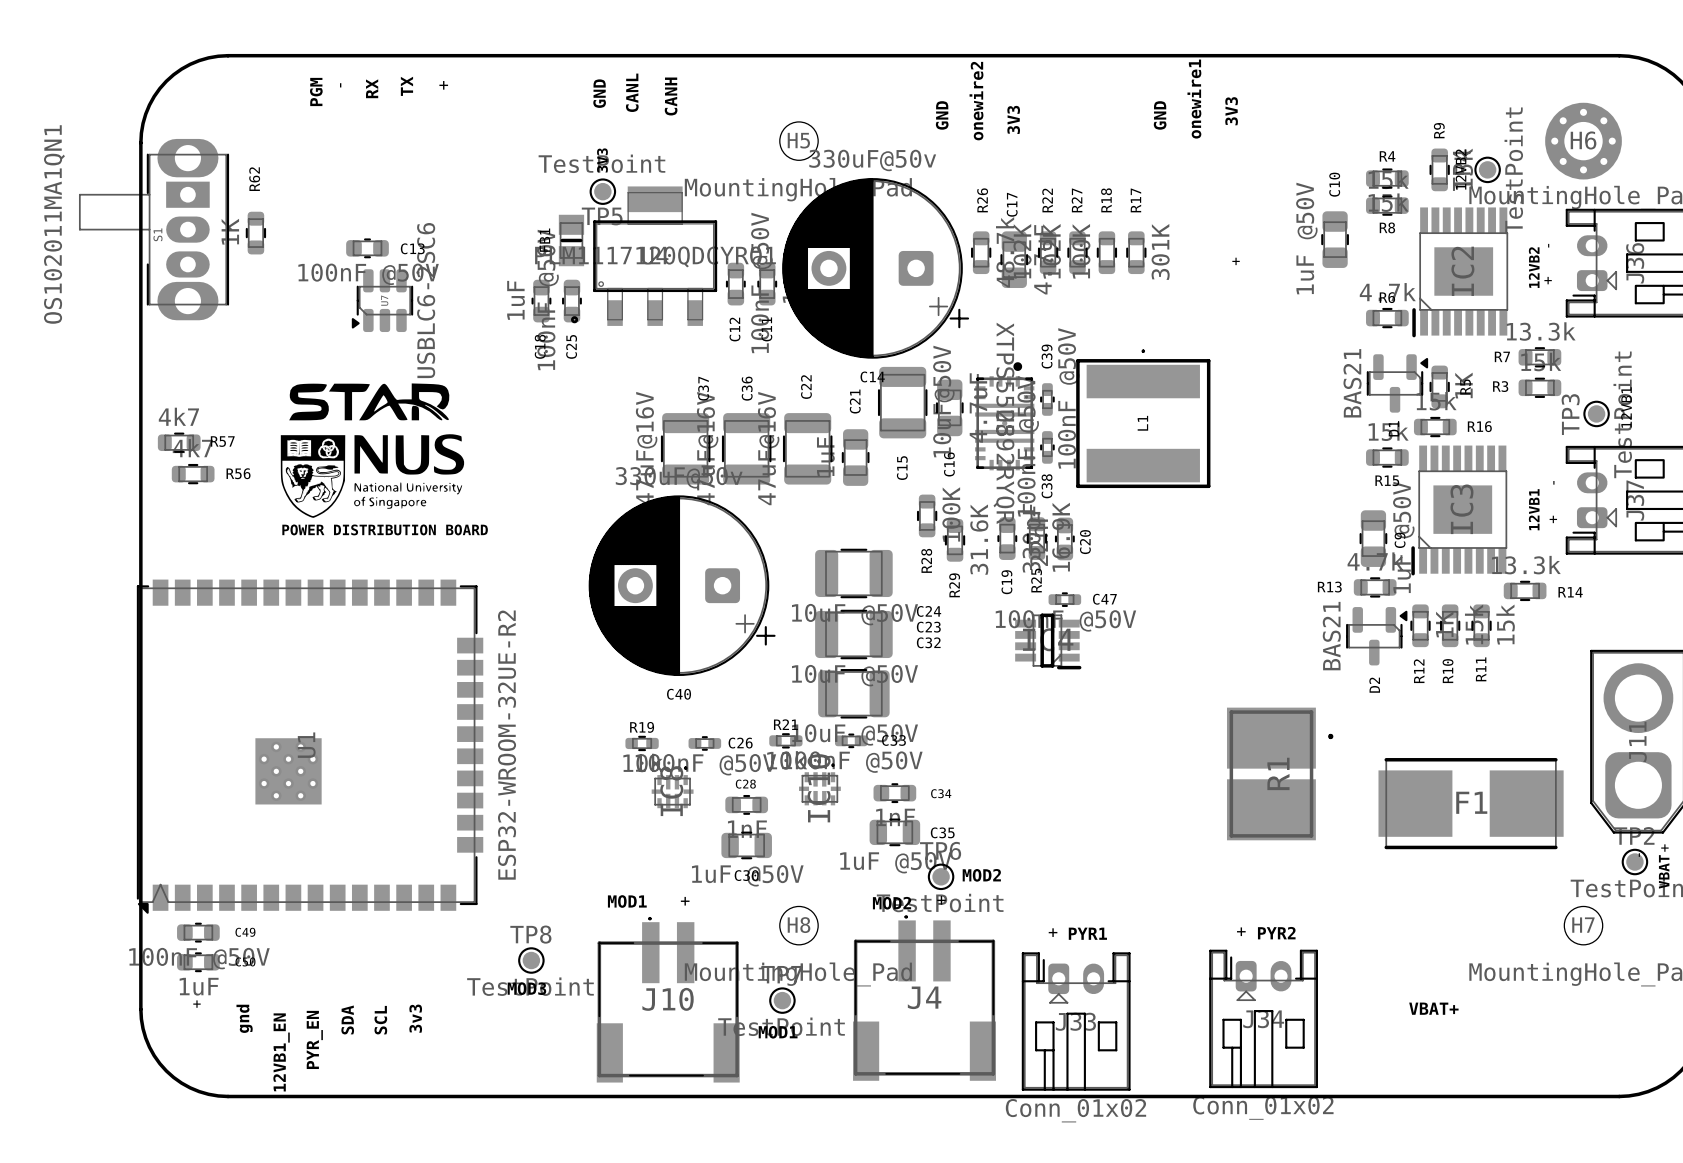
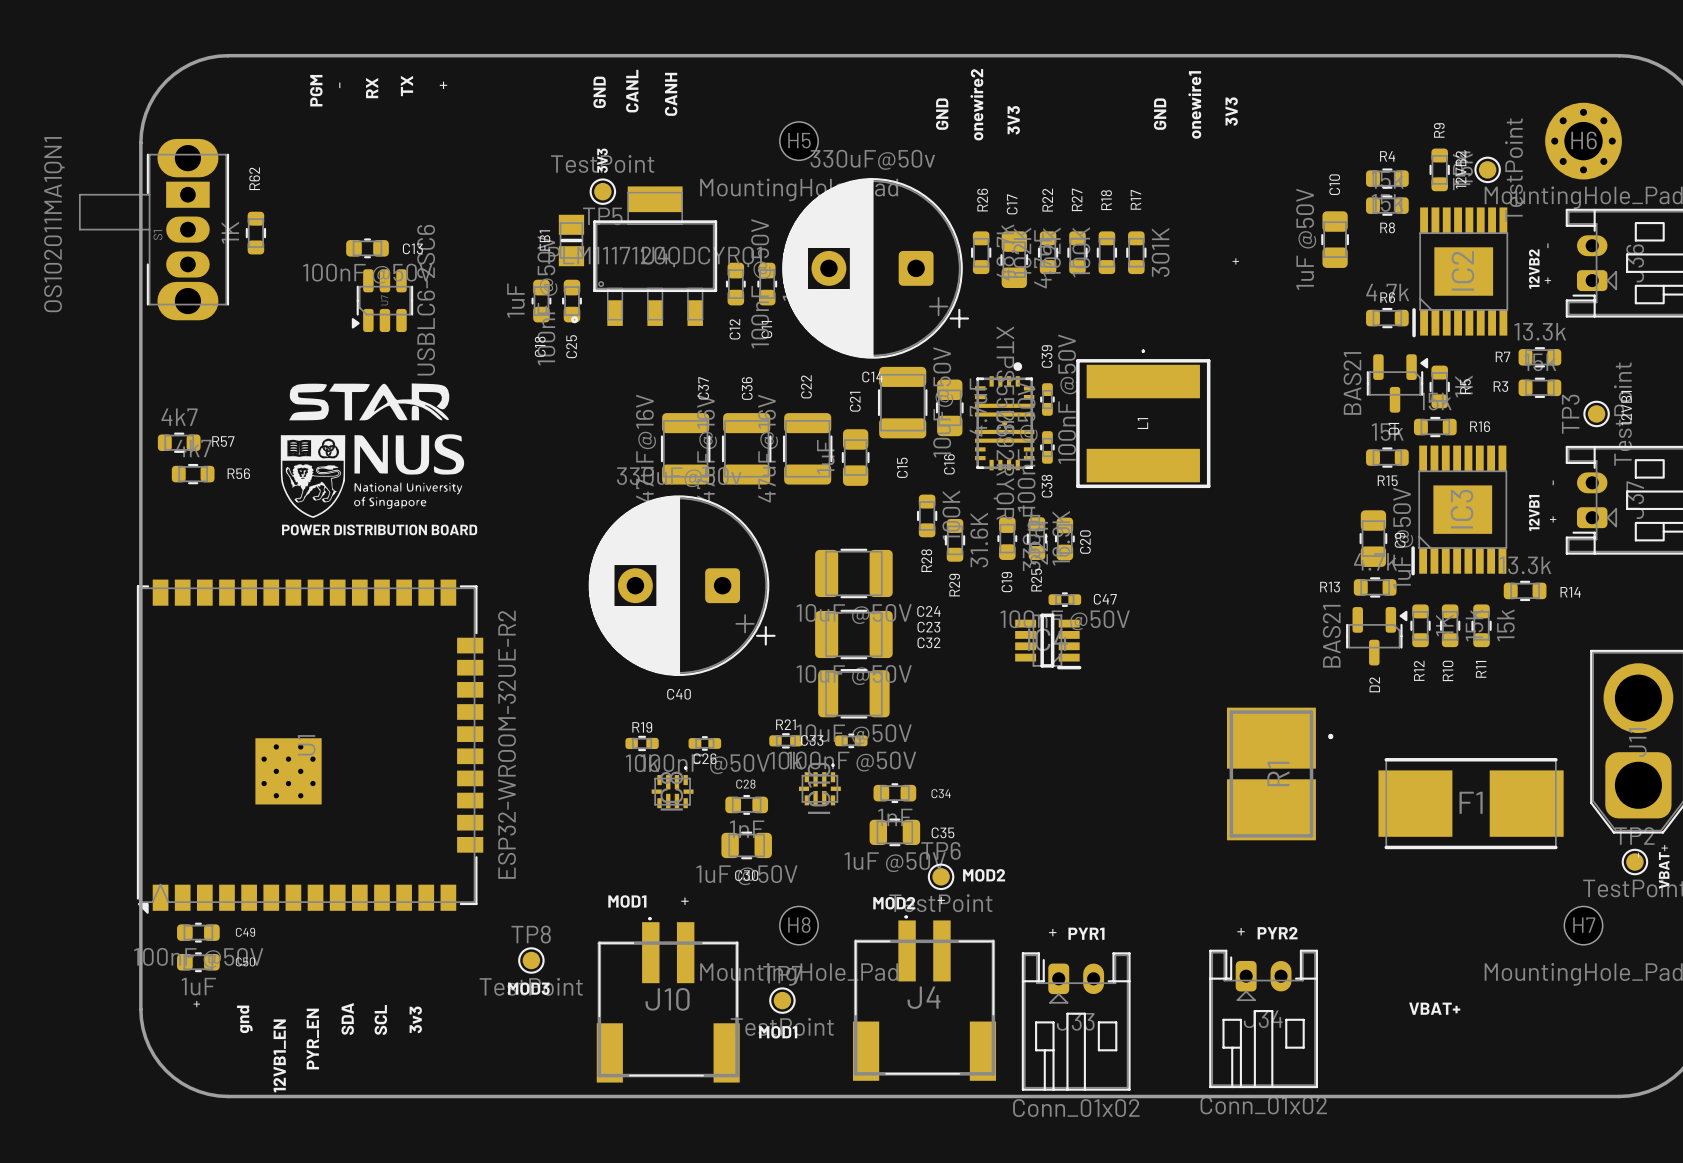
C33 name position: C33 (893, 740) -> C33 (812, 740)
C26 name position: C26 (740, 743) -> C26 (705, 758)

